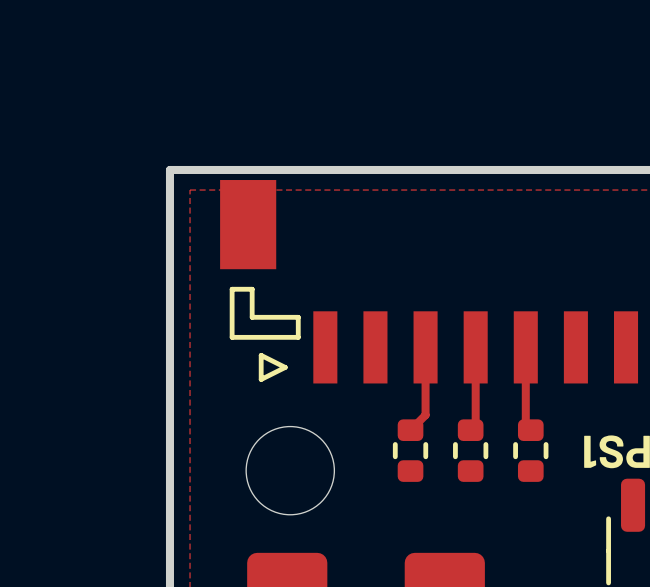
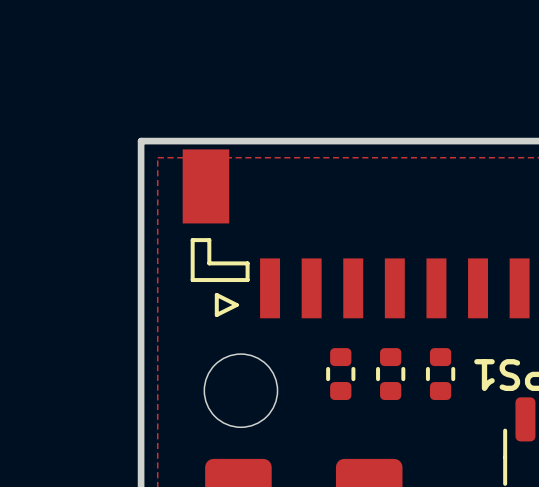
track: (425, 347) (425, 415) (410, 430) -> none
track: (475, 347) (475, 425) (470, 430) -> none
track: (525, 347) (525, 425) (530, 430) -> none

